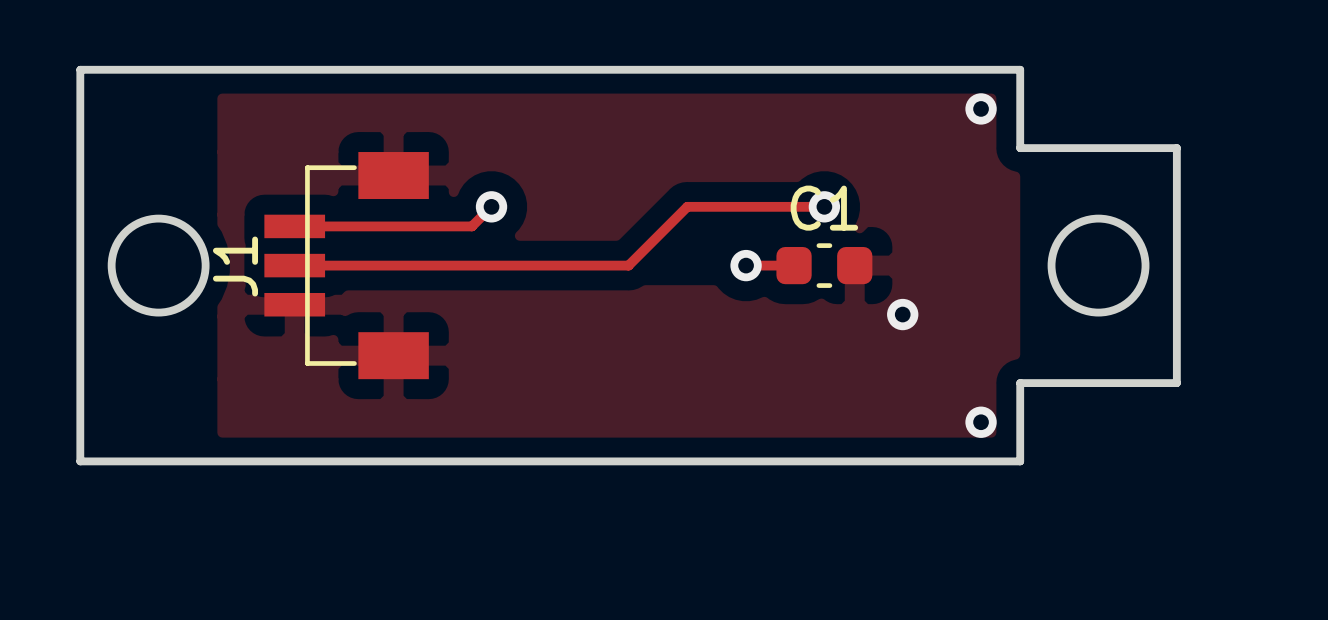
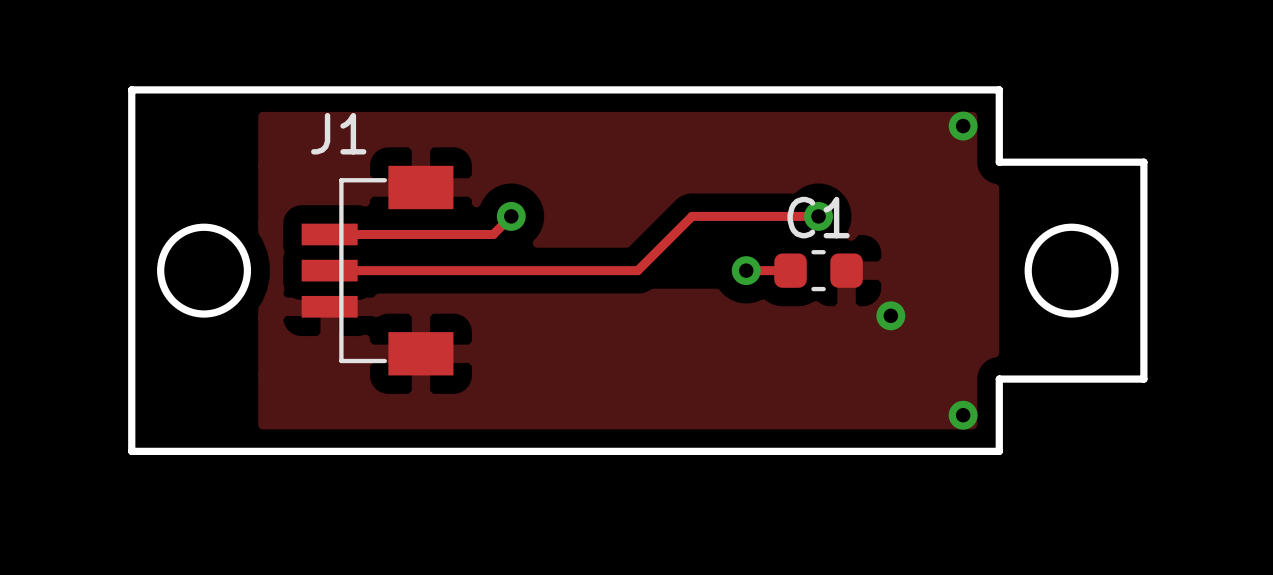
J1 name rotation: 0° (235, 266) -> 90° clockwise (338, 133)
J1 name position: J1 (235, 266) -> J1 (338, 133)

